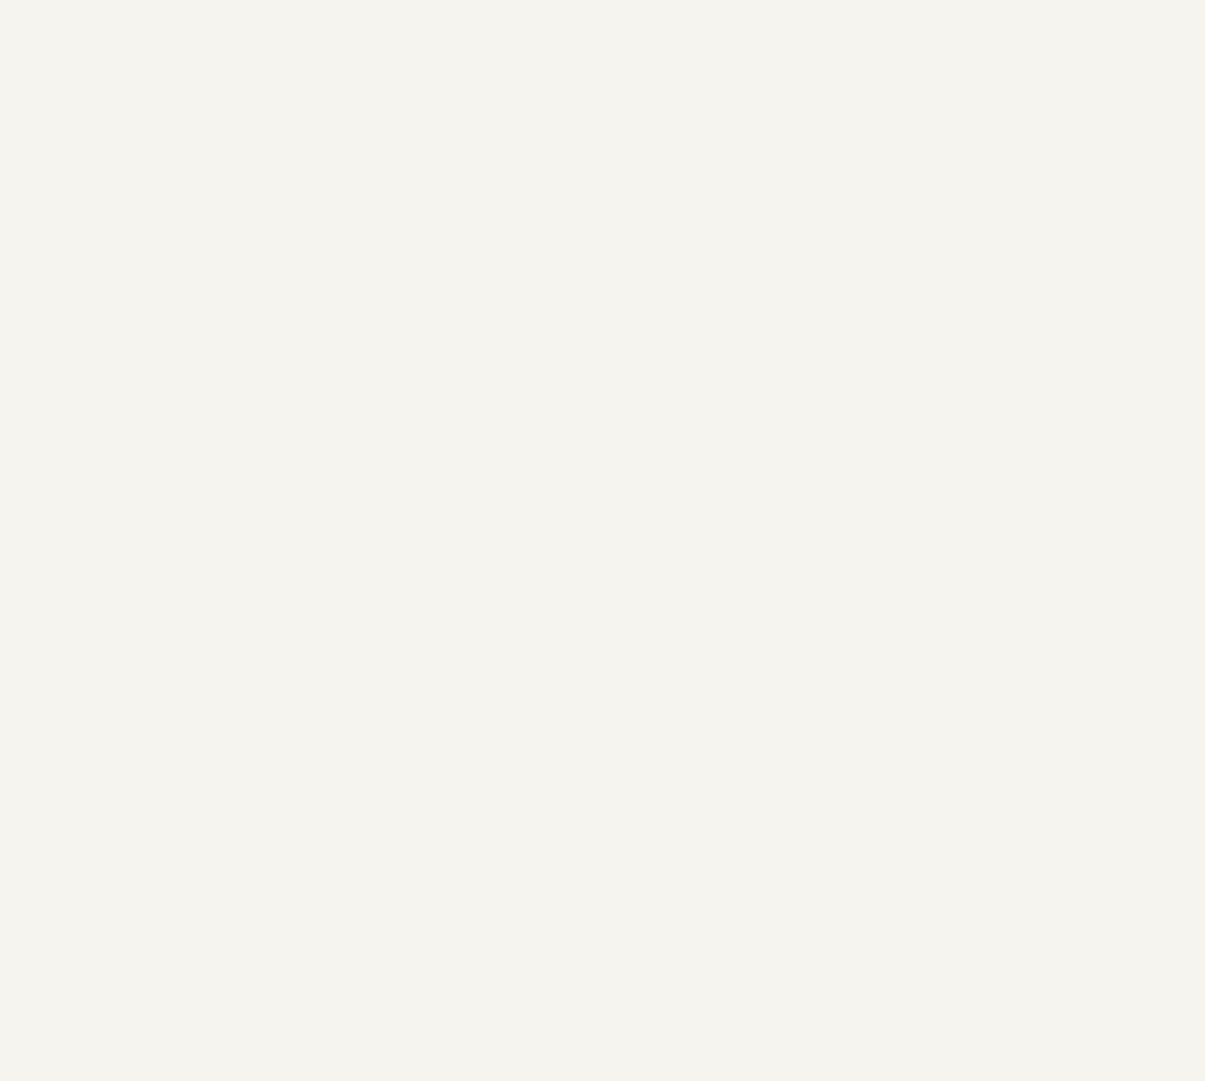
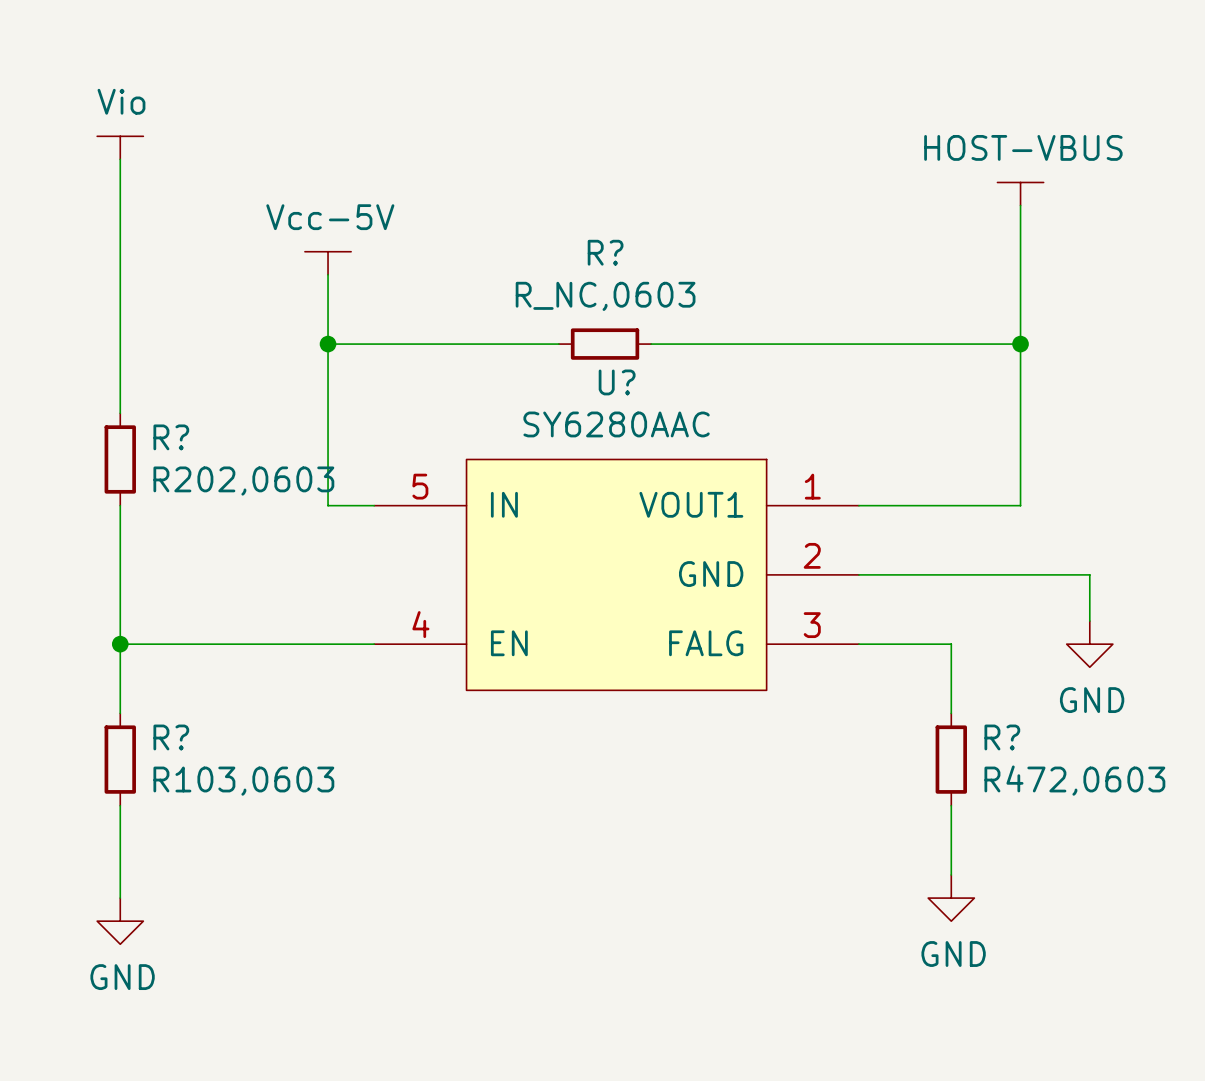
power symbol: none -> Vio (120, 147)
wire: none -> (120, 159) (120, 413)
power symbol: none -> HOST-VBUS (1020, 194)
wire: none -> (1020, 205) (1020, 505) (858, 505)
power symbol: none -> Vcc-5V (328, 263)
wire: none -> (328, 274) (328, 505) (374, 505)
wire: none -> (328, 344) (558, 344)
junction: none -> (328, 344)
R?: none -> R_NC,0603 (605, 344)
wire: none -> (651, 344) (1020, 344)
junction: none -> (1020, 344)
R?: none -> R202,0603 (120, 459)
wire: none -> (120, 505) (120, 713)
U?: none -> SY6280AAC (616, 574)
wire: none -> (858, 574) (1089, 574) (1089, 621)
wire: none -> (120, 644) (374, 644)
junction: none -> (120, 644)
wire: none -> (858, 644) (951, 644) (951, 713)
power symbol: none -> GND (1089, 644)
R?: none -> R103,0603 (120, 759)
R?: none -> R472,0603 (951, 759)
wire: none -> (120, 805) (120, 898)
wire: none -> (951, 805) (951, 875)
power symbol: none -> GND (951, 898)
power symbol: none -> GND (120, 921)

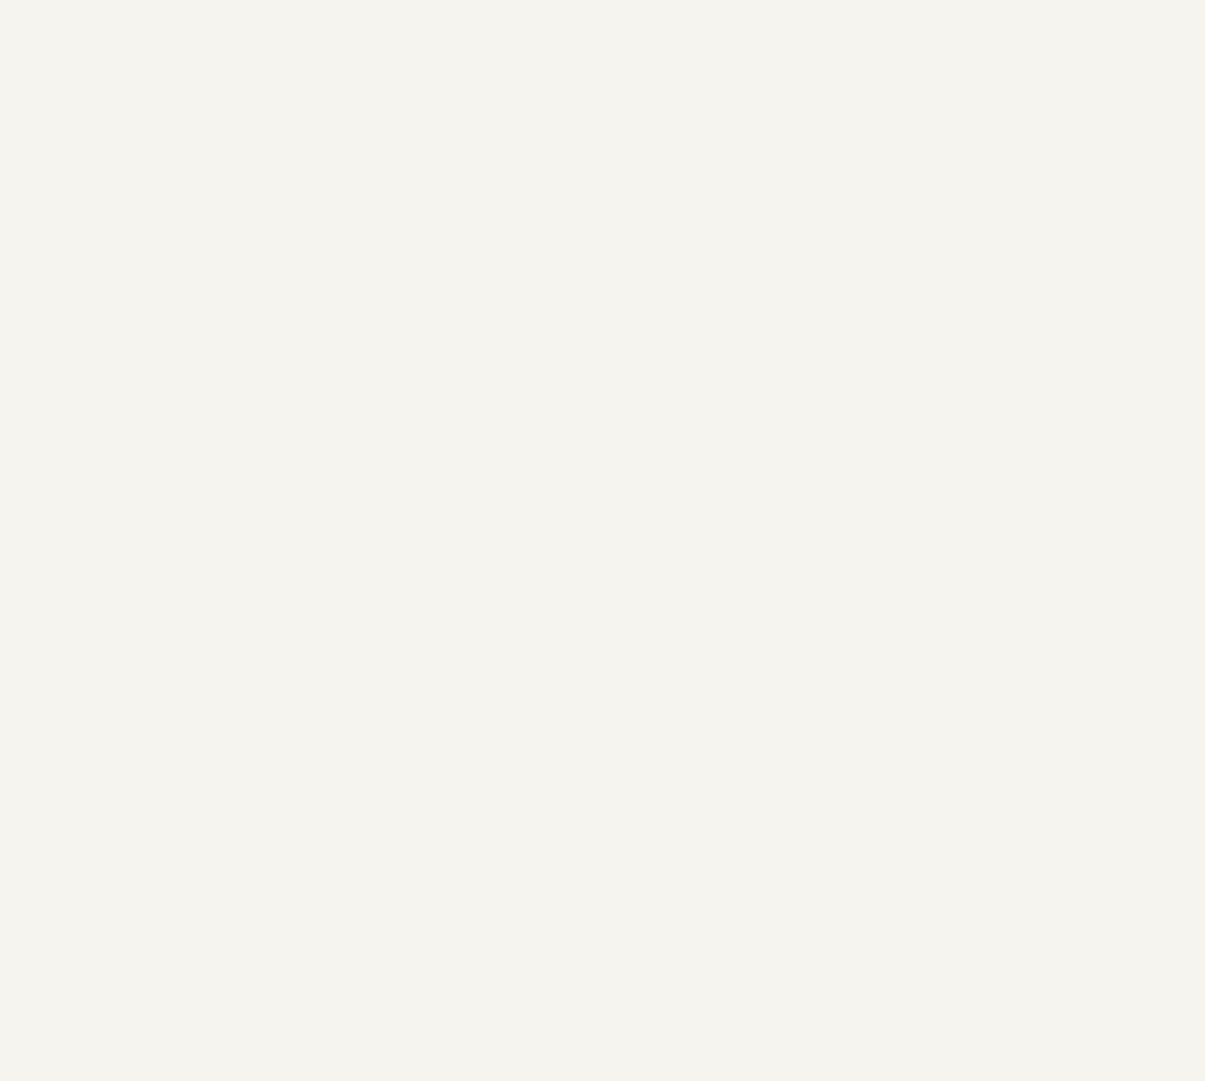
power symbol: Vio (120, 147) -> none
wire: (120, 159) (120, 413) -> none
power symbol: HOST-VBUS (1020, 194) -> none
wire: (1020, 205) (1020, 505) (858, 505) -> none
power symbol: Vcc-5V (328, 263) -> none
wire: (328, 274) (328, 505) (374, 505) -> none
wire: (328, 344) (558, 344) -> none
junction: (328, 344) -> none
R?: R_NC,0603 (605, 344) -> none
wire: (651, 344) (1020, 344) -> none
junction: (1020, 344) -> none
R?: R202,0603 (120, 459) -> none
wire: (120, 505) (120, 713) -> none
U?: SY6280AAC (616, 574) -> none
wire: (858, 574) (1089, 574) (1089, 621) -> none
wire: (120, 644) (374, 644) -> none
junction: (120, 644) -> none
wire: (858, 644) (951, 644) (951, 713) -> none
power symbol: GND (1089, 644) -> none
R?: R103,0603 (120, 759) -> none
R?: R472,0603 (951, 759) -> none
wire: (120, 805) (120, 898) -> none
wire: (951, 805) (951, 875) -> none
power symbol: GND (951, 898) -> none
power symbol: GND (120, 921) -> none

